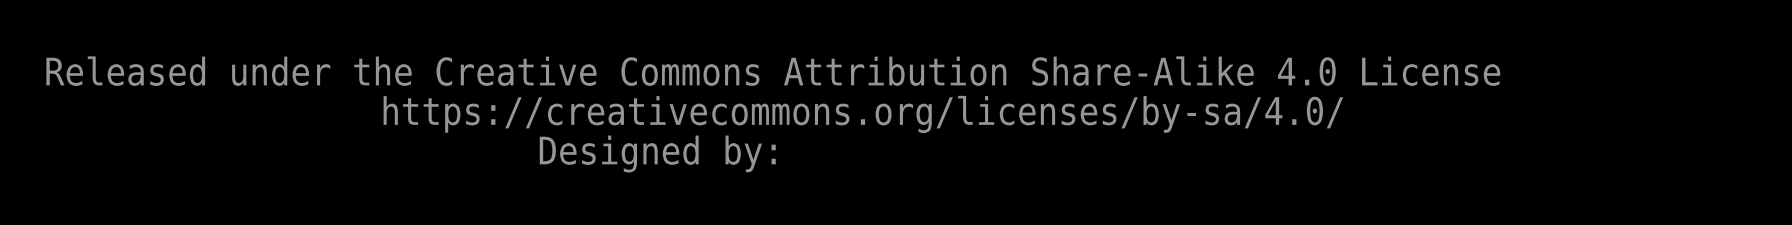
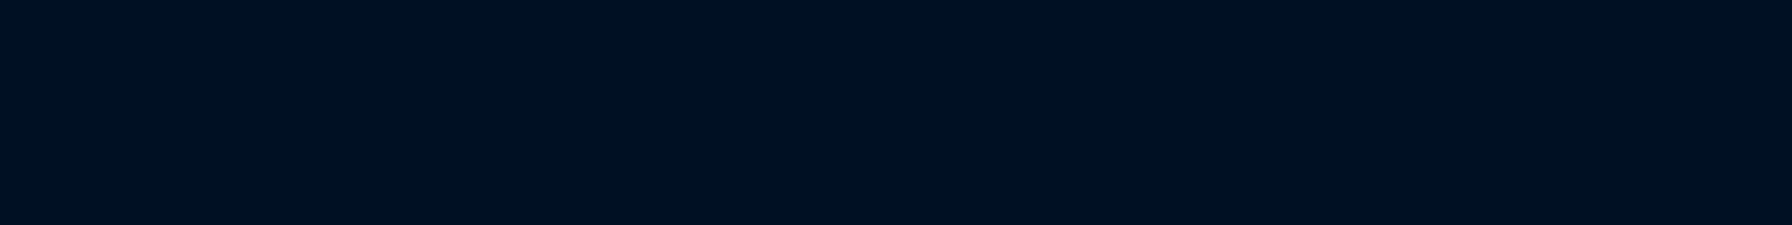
drawing: [46, 56, 1501, 173] -> none

